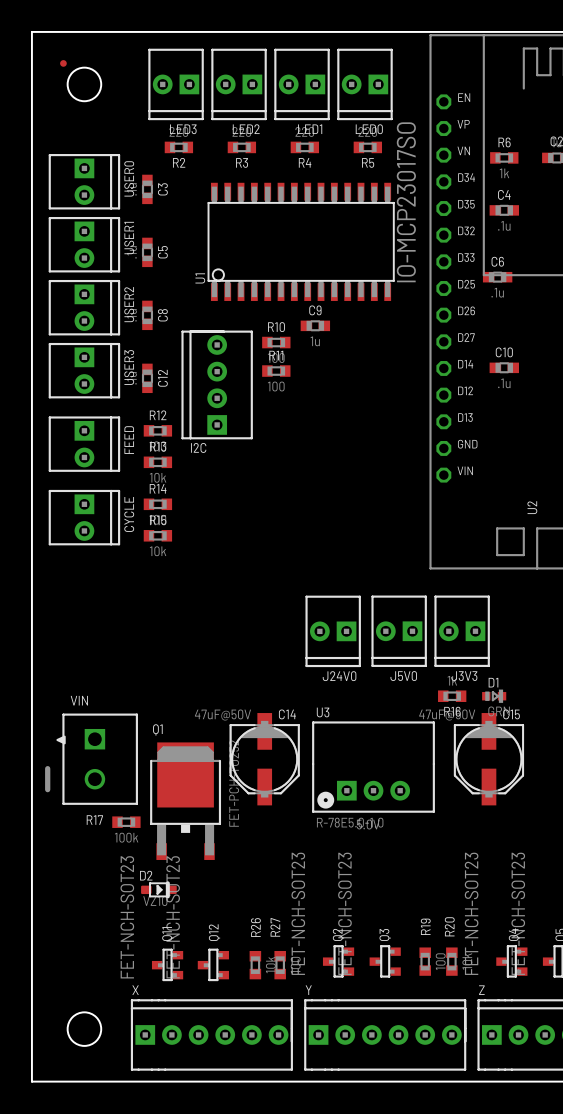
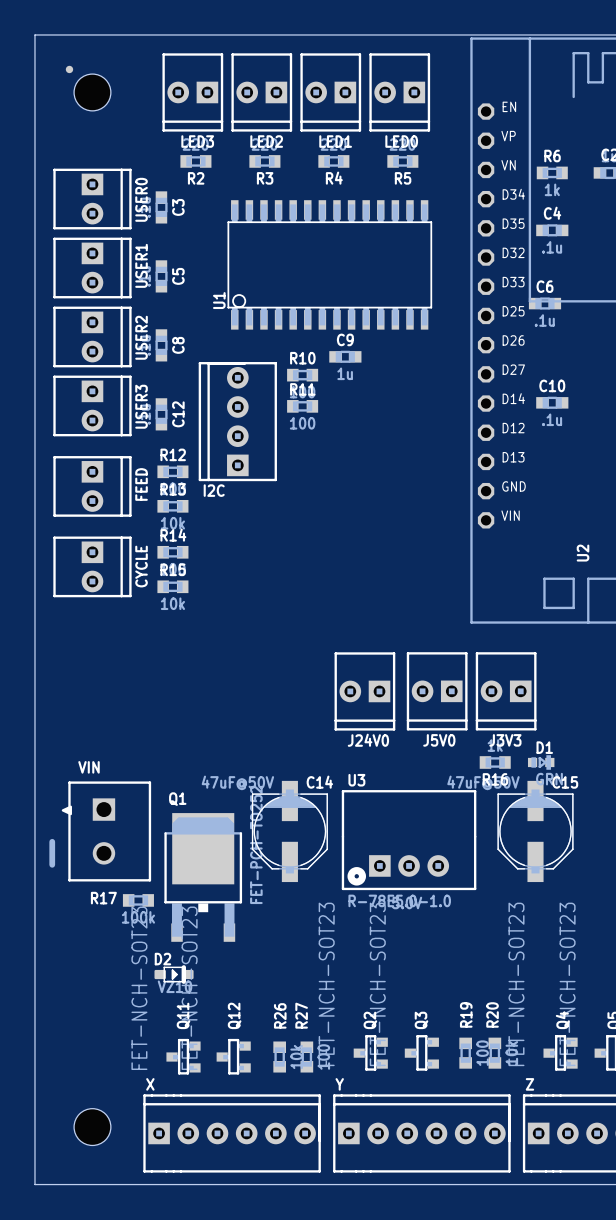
U1 value: IO-MCP23017SO (406, 202) -> none

